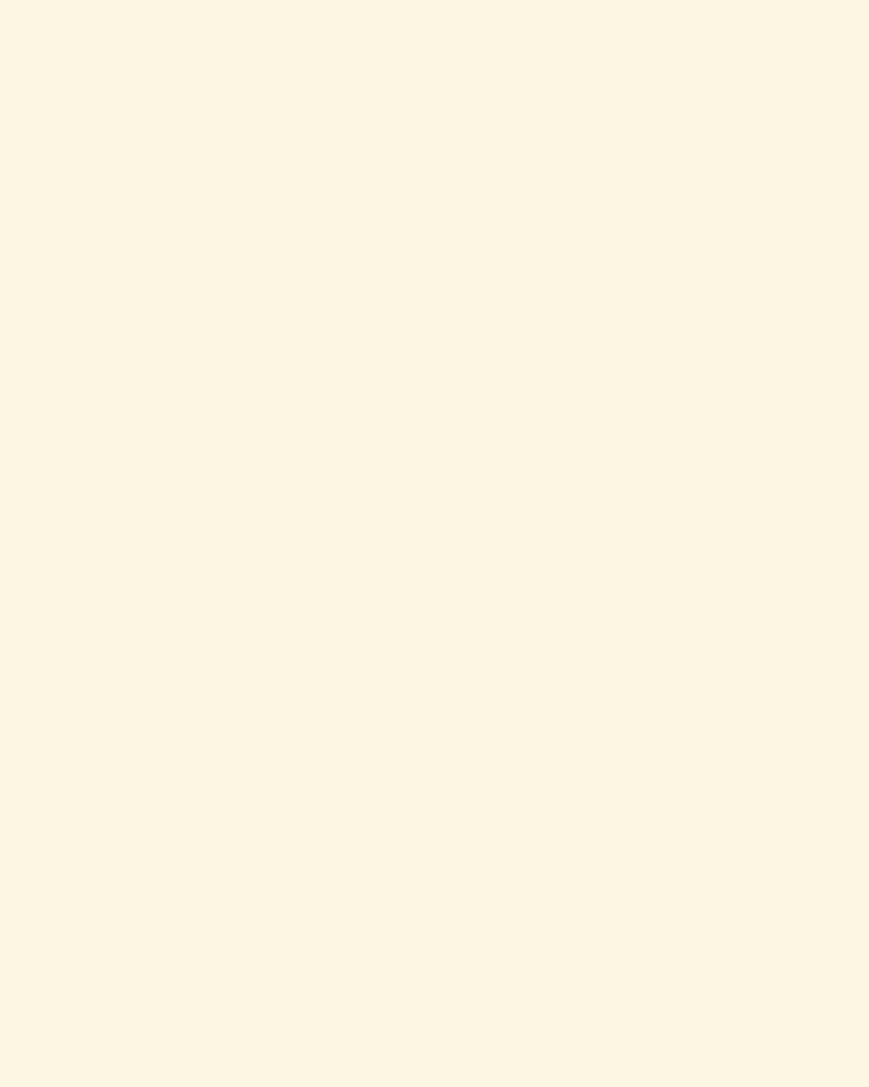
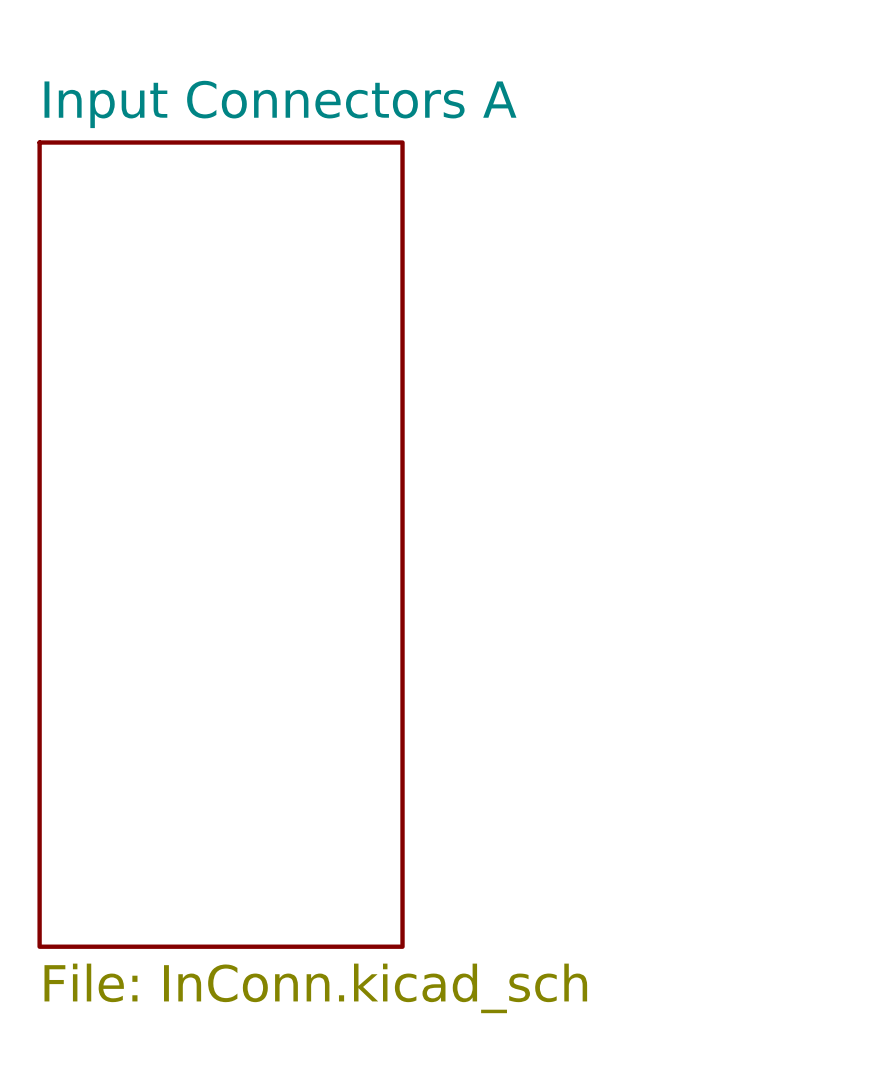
sheet Input Connectors A: none -> File: InConn.kicad_sch (221, 544)

